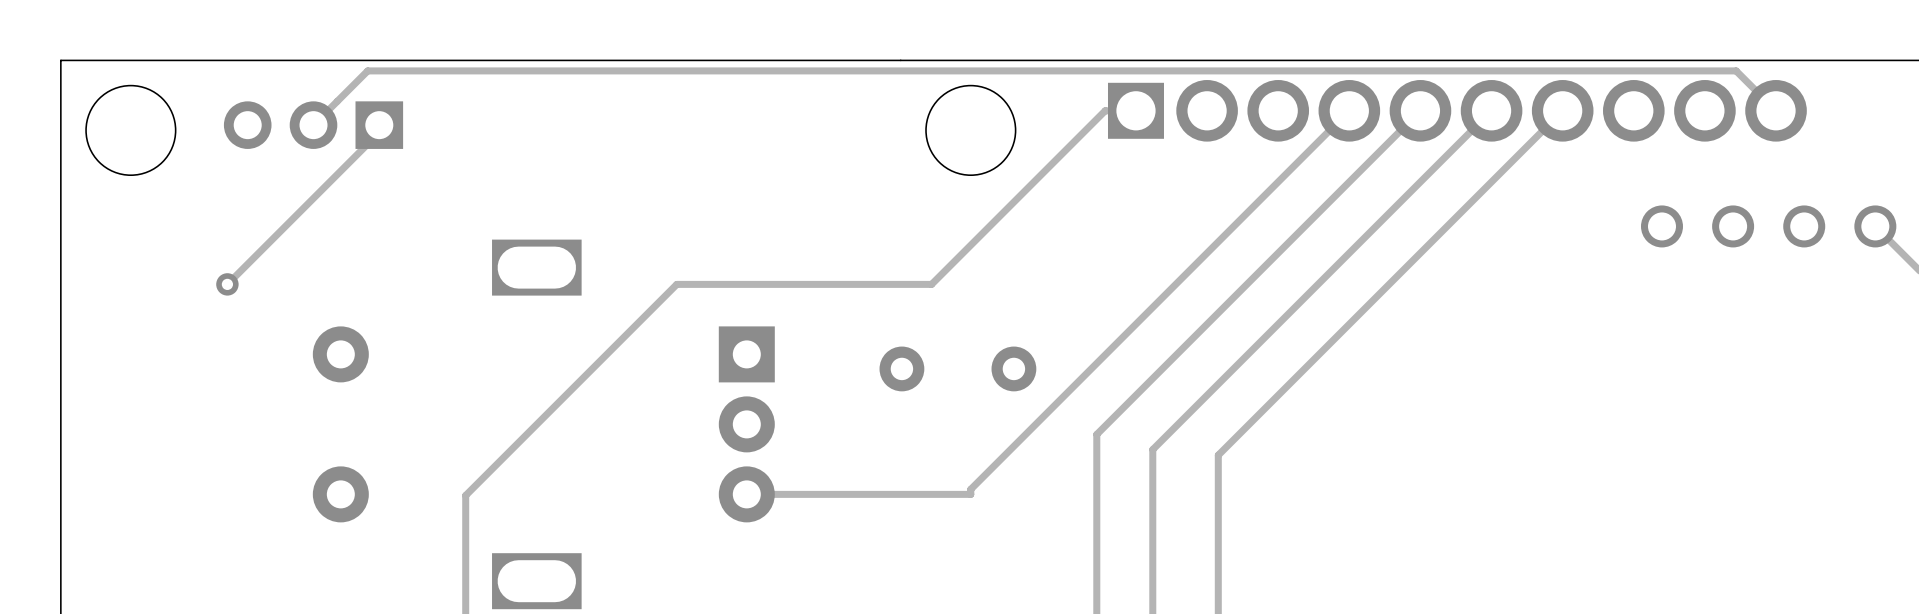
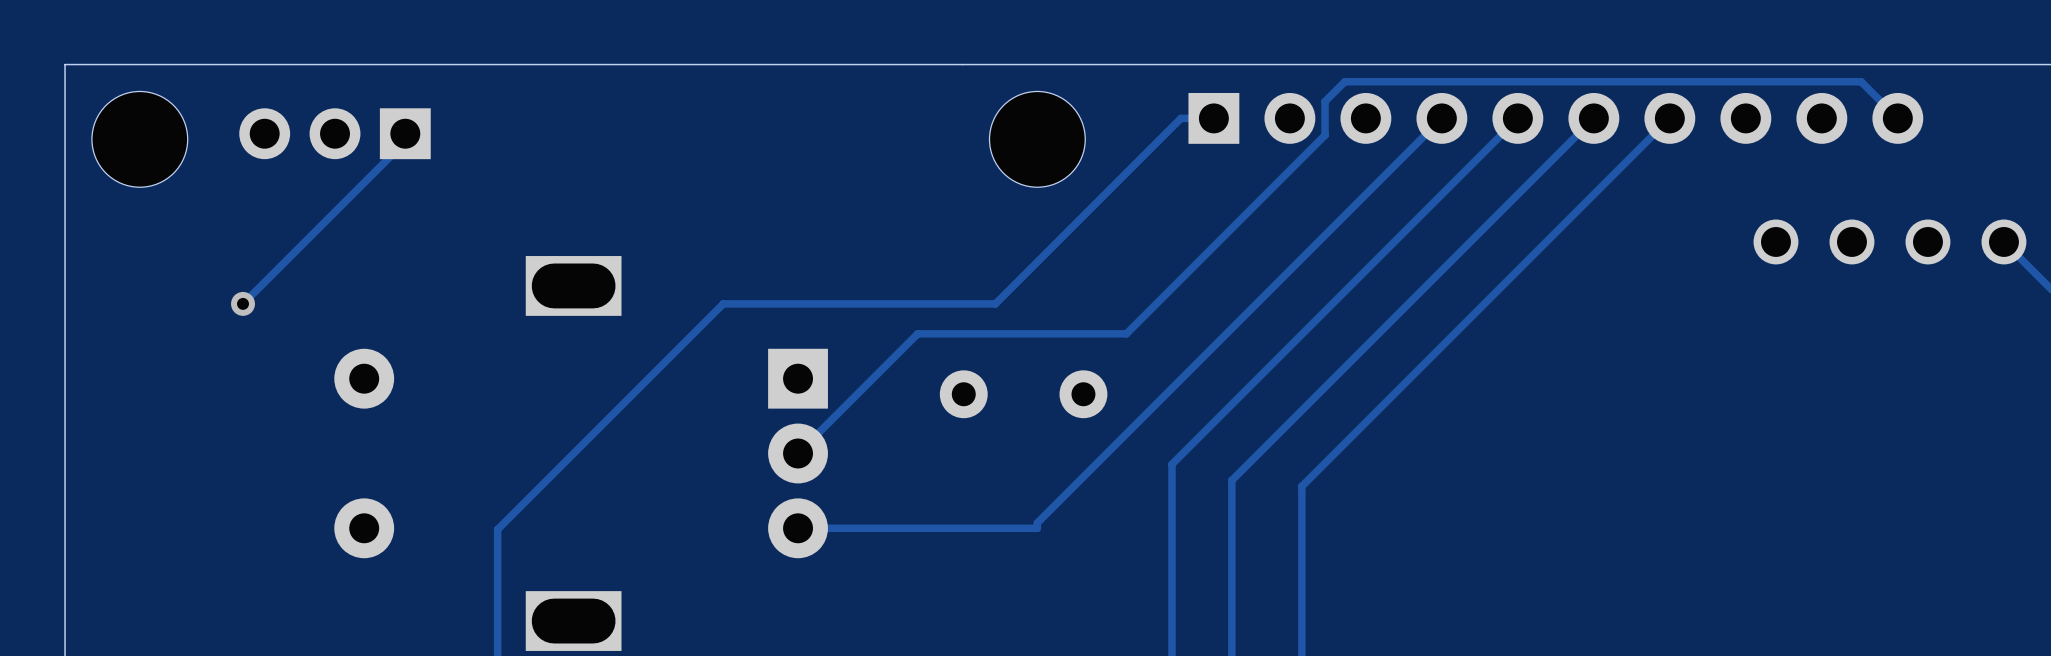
track: (1741, 76) (1736, 70) (367, 70) (313, 125) -> (1861, 81) (1344, 81) (1325, 101) (1325, 135) (1126, 333) (917, 333) (798, 453)
part footprint: [1107, 80, 1807, 142] -> [1188, 92, 1924, 144]

